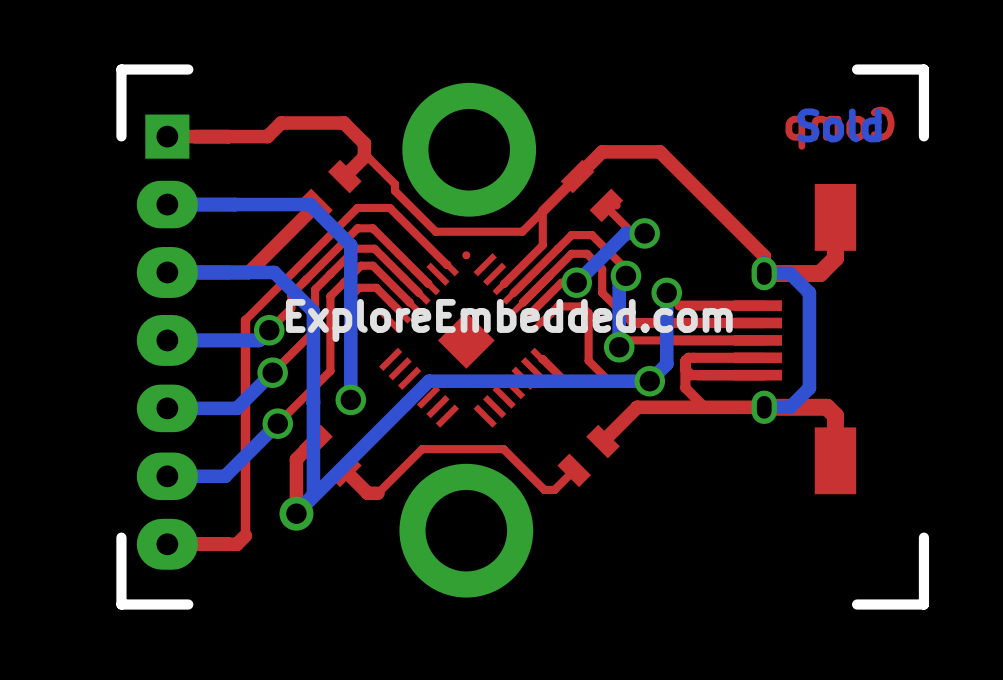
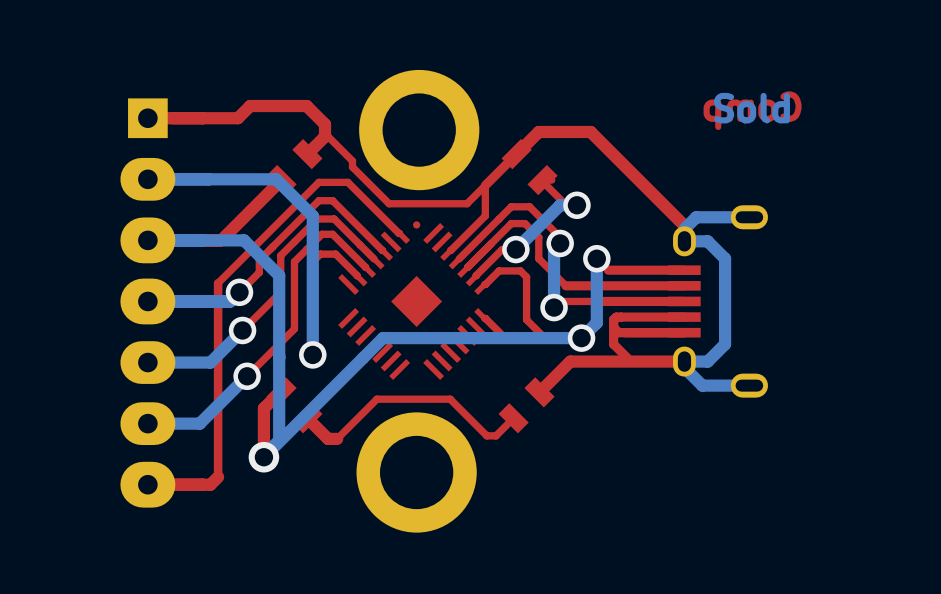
board edge: (188, 69) (121, 69) (121, 136) -> none
board edge: (857, 69) (923, 69) (923, 136) -> none
part footprint: [733, 183, 857, 495] -> [668, 205, 769, 398]
top track: (835, 217) (835, 258) (820, 273) (764, 273) -> none
bottom track: none -> (749, 217) (696, 217) (684, 229)
text: ExploreEmbedded.com (509, 320) -> none
top track: (764, 407) (827, 407) (835, 415) (835, 460) -> none
bottom track: none -> (684, 367) (702, 385) (749, 385)
board edge: (121, 537) (121, 604) (188, 604) -> none
board edge: (923, 537) (923, 604) (857, 604) -> none

